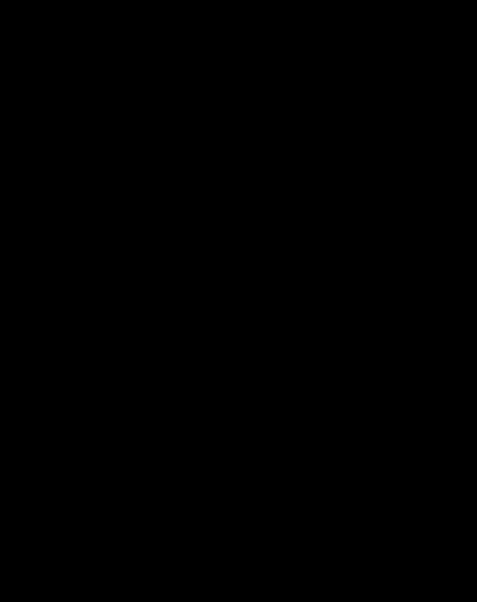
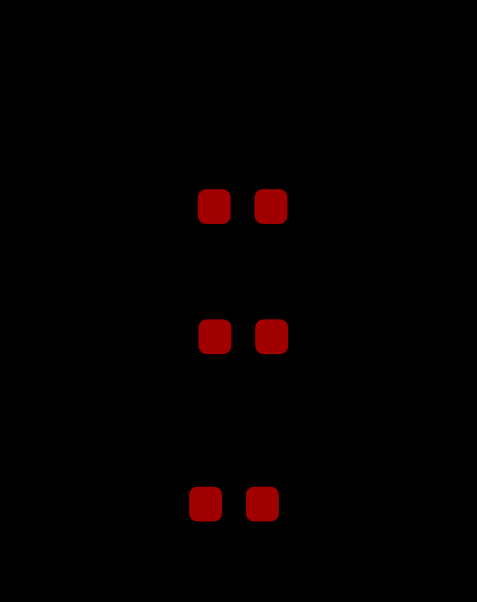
part: none -> (242, 206)
part: none -> (243, 336)
part: none -> (234, 504)

